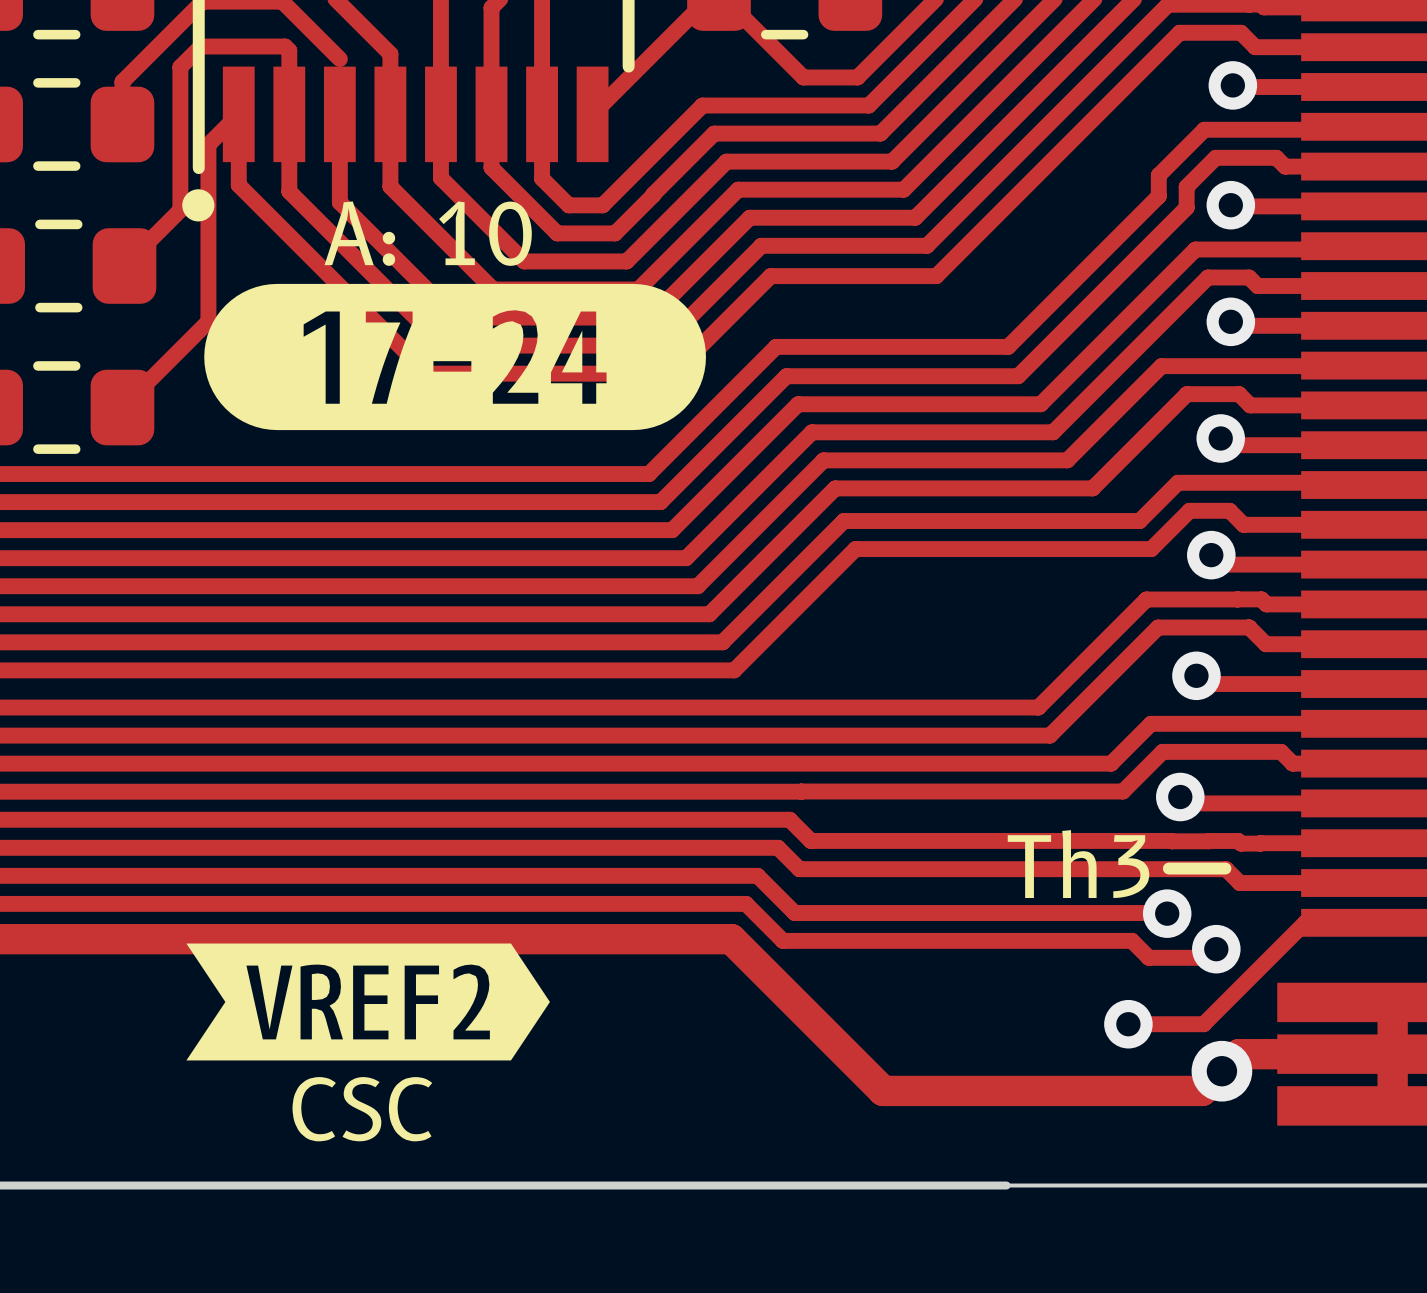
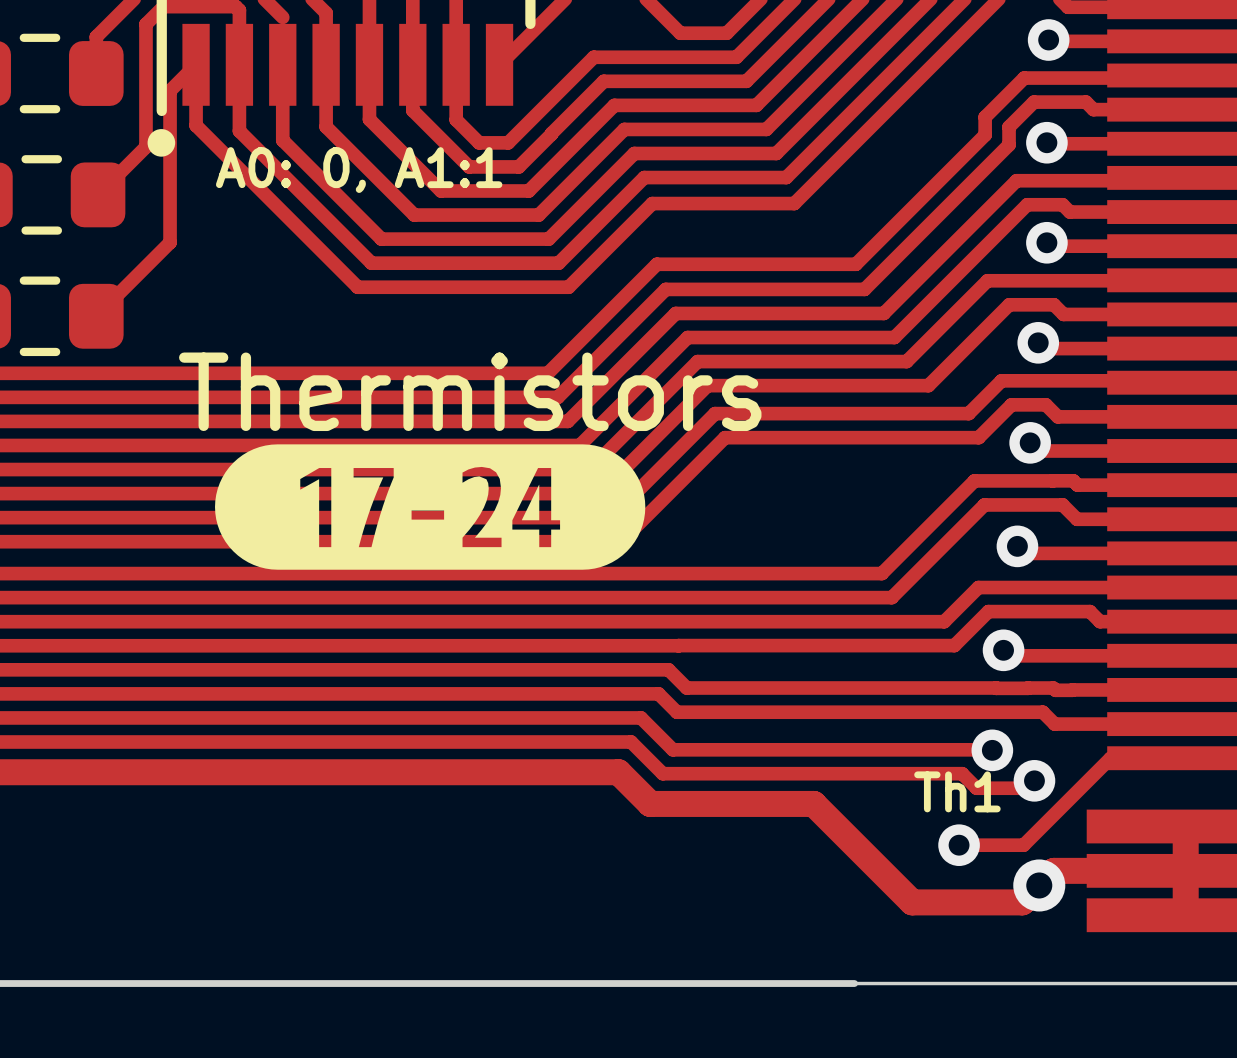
text: A: 10 (428, 233) -> A0: 0, A1:1 (359, 170)
drawing position: (455, 356) -> (430, 507)
text: none -> Thermistors (470, 391)
text: Th3 (1078, 864) -> Th1 (957, 791)
line: (1168, 868) (1225, 868) -> none
drawing: [186, 943, 550, 1061] -> none
track: (768, 976) (883, 1090) (1073, 1090) -> (650, 803) (813, 803) (912, 902)
text: CSC (362, 1109) -> none

